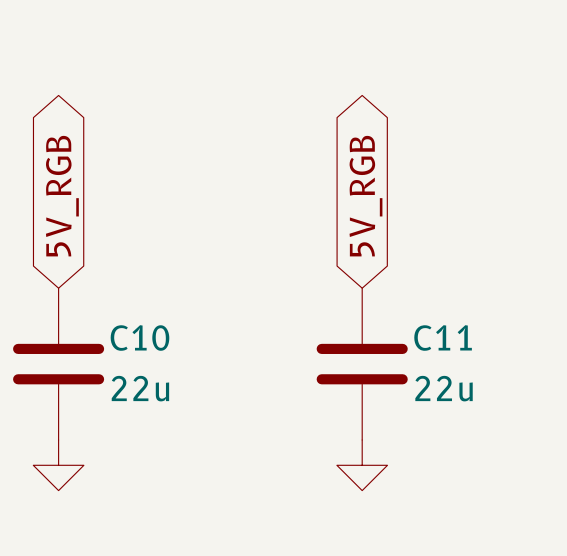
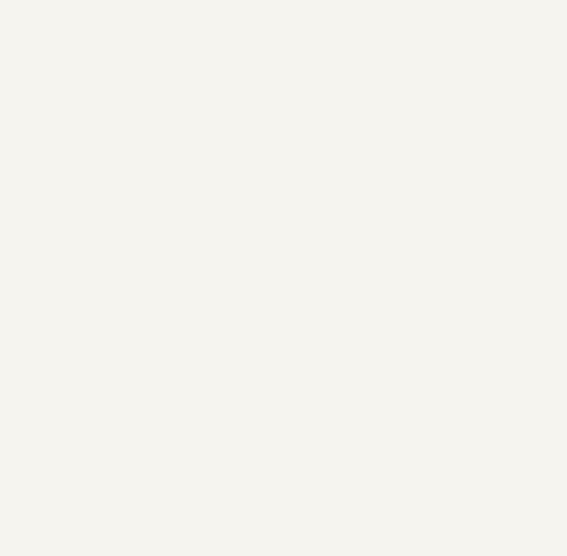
global label: 5V_RGB (62, 196) -> none
global label: 5V_RGB (365, 196) -> none
C10: 22u (58, 364) -> none
C11: 22u (362, 364) -> none
power symbol: (58, 465) -> none
power symbol: (362, 465) -> none

